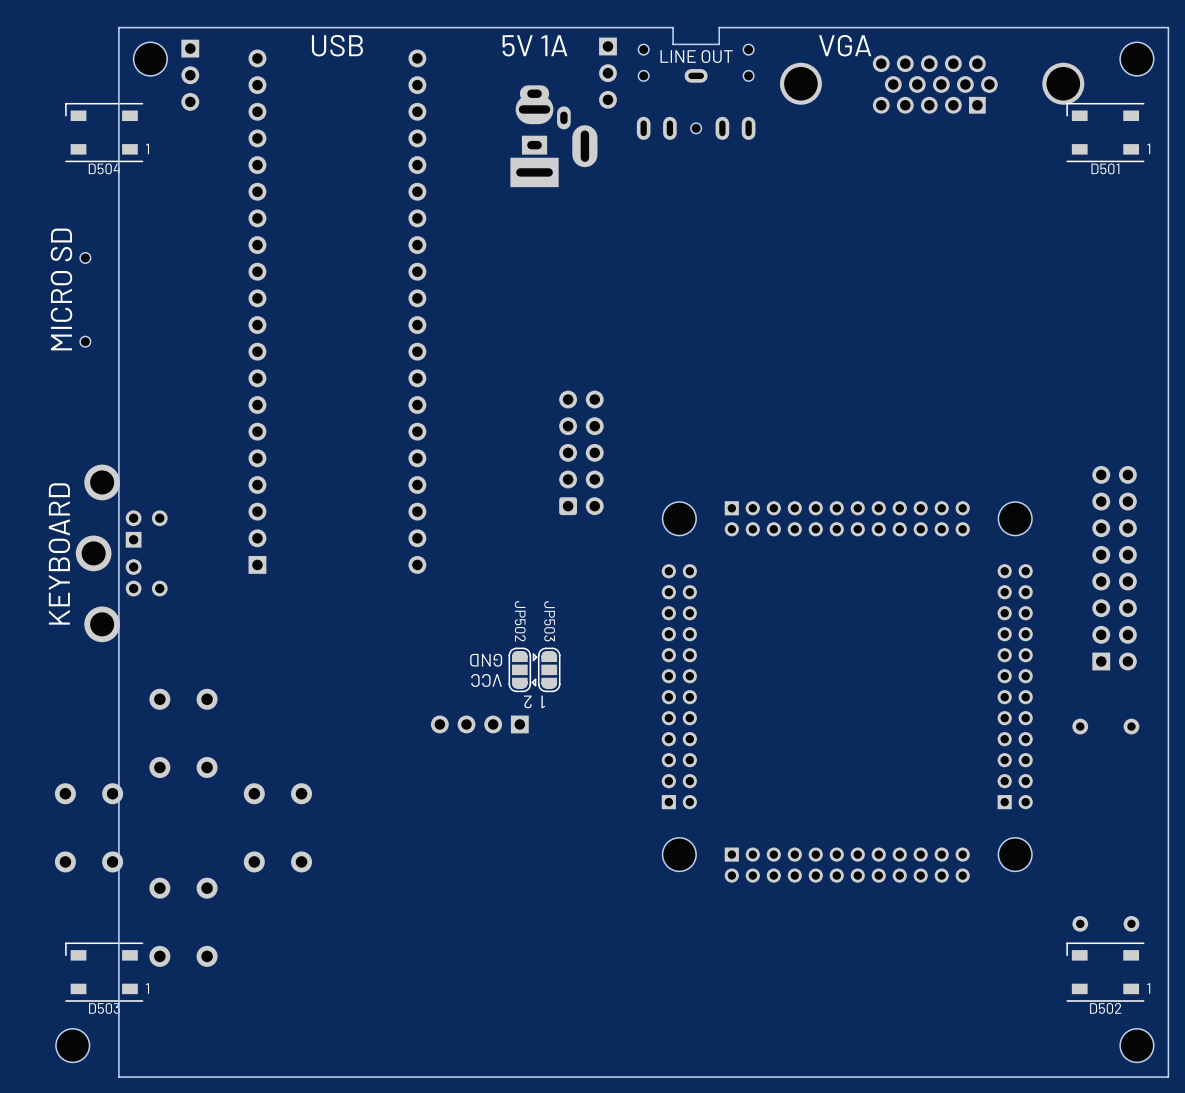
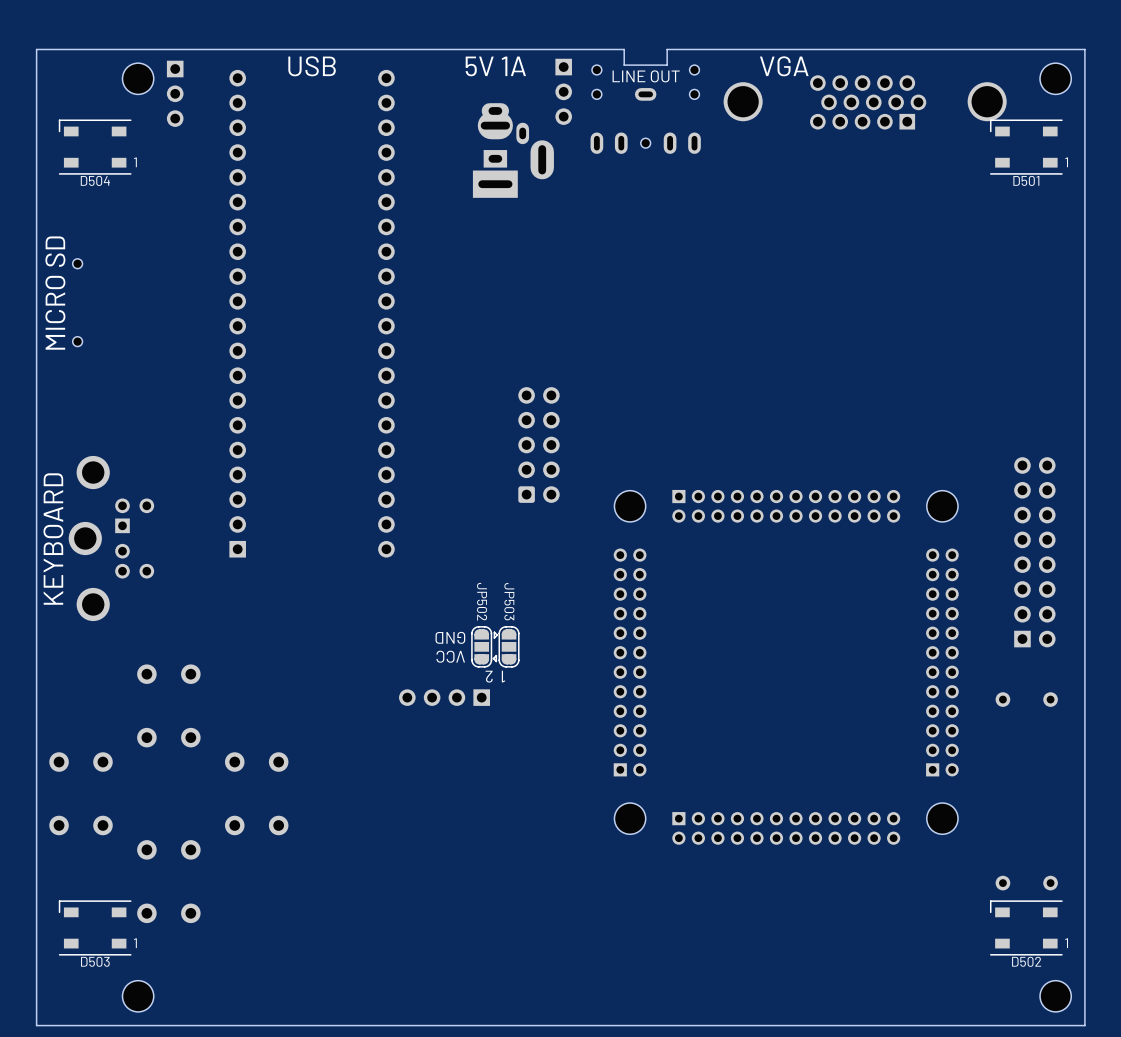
board edge: (118, 27) (118, 1077) -> (108, 49) (36, 49) (36, 1025) (108, 1025)
part position: (72, 1045) -> (138, 996)

